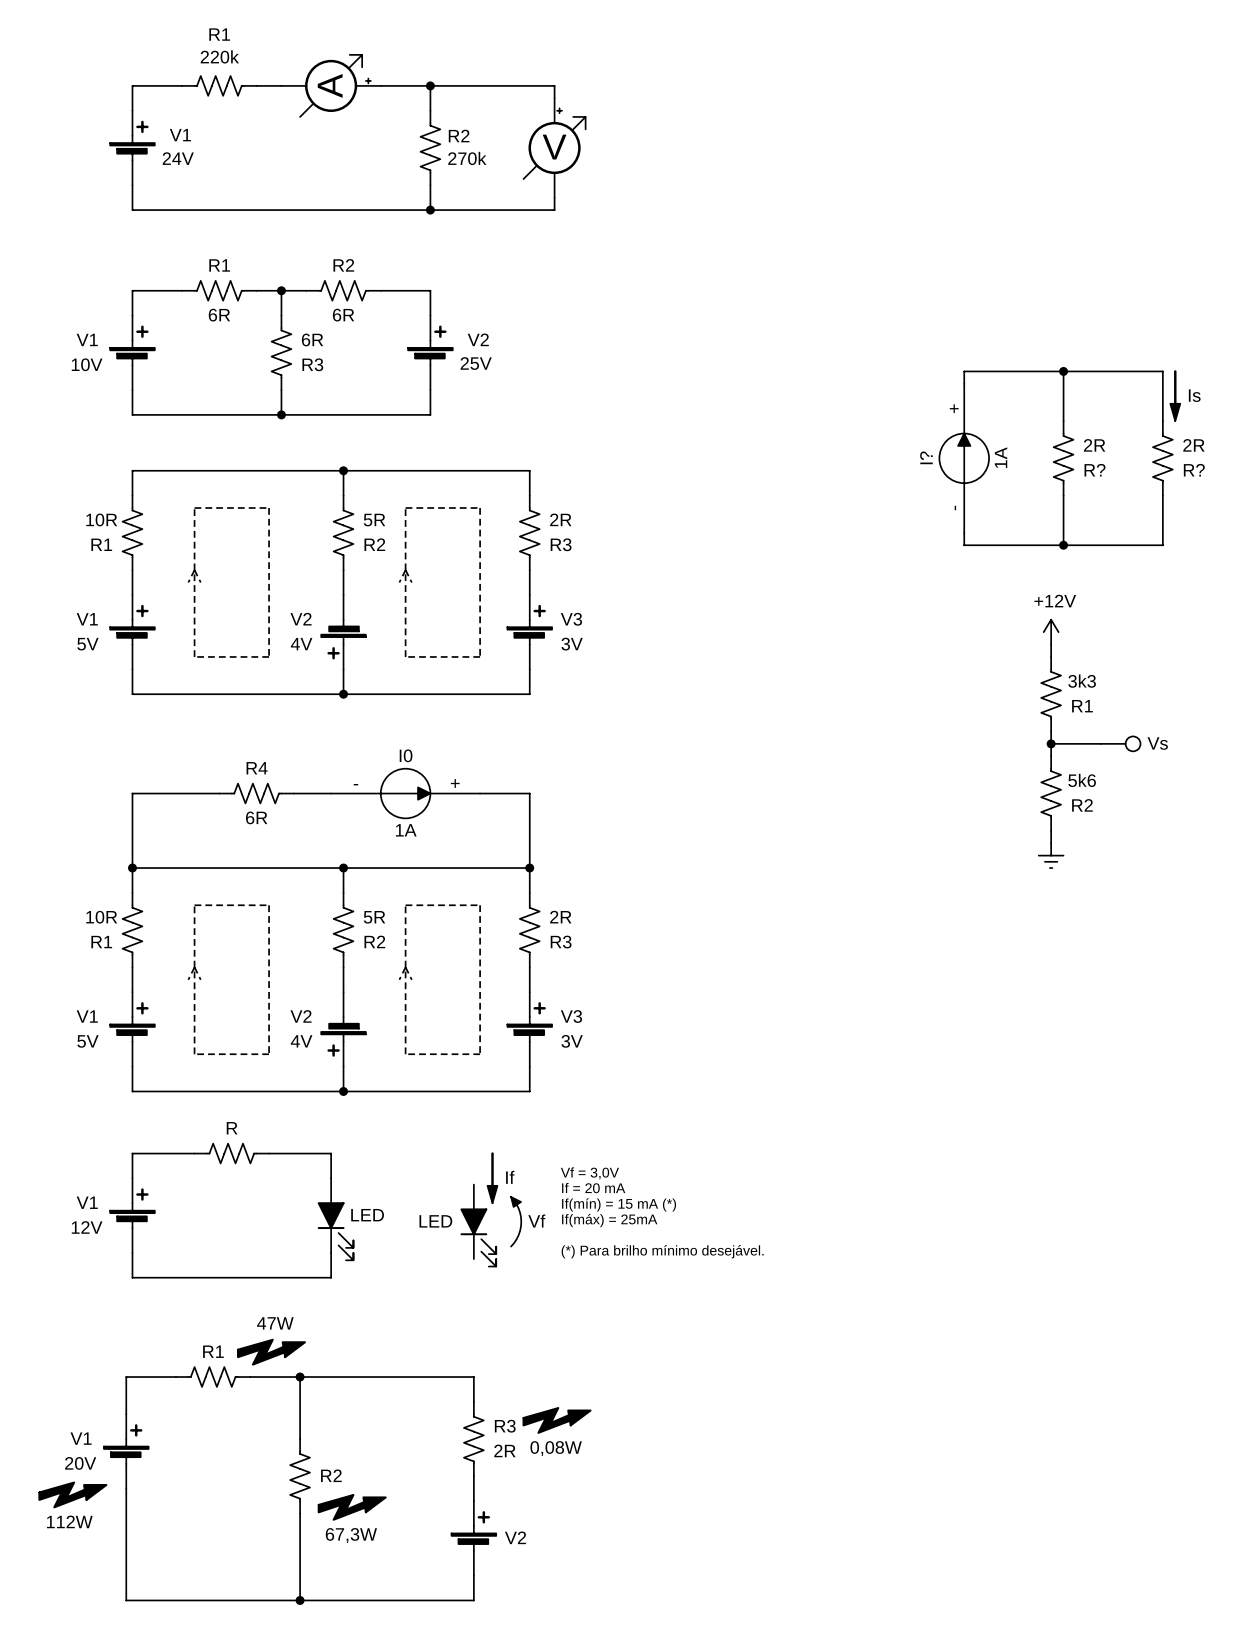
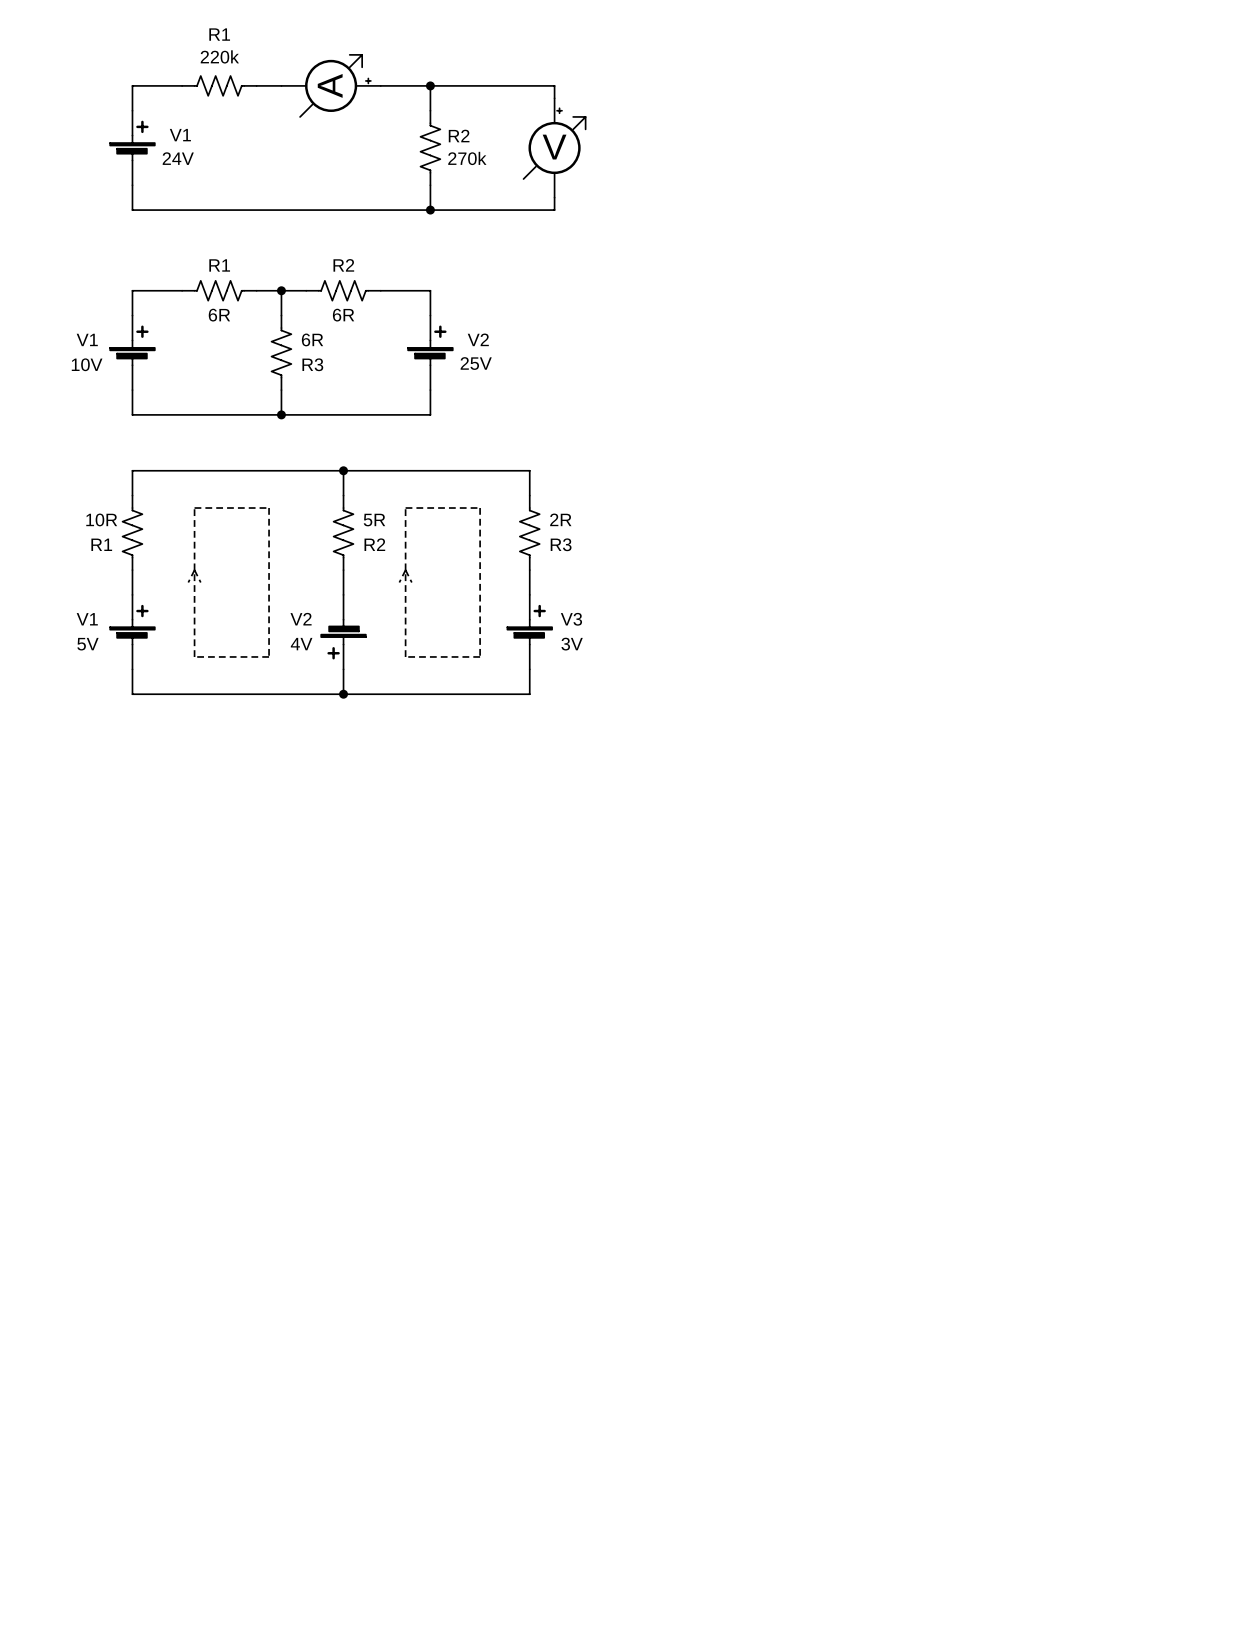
wire: (1063, 371) (1063, 421) -> none
junction: (1063, 371) -> none
wire: (964, 383) (964, 371) (1162, 371) (1162, 421) -> none
Is: (1175, 395) -> none
I?: 1A (964, 458) -> none
R?: 2R (1063, 458) -> none
R?: 2R (1162, 458) -> none
wire: (1063, 495) (1063, 545) -> none
wire: (1162, 495) (1162, 545) (964, 545) (964, 532) -> none
junction: (1063, 545) -> none
power symbol: +12V (1051, 632) -> none
wire: (1051, 644) (1051, 656) -> none
R1: 3k3 (1051, 694) -> none
wire: (1051, 731) (1051, 756) -> none
wire: (1051, 743) (1100, 743) -> none
junction: (1051, 743) -> none
Vs: (1120, 743) -> none
wire: (219, 793) (132, 793) (132, 892) -> none
R4: 6R (256, 793) -> none
wire: (293, 793) (331, 793) -> none
I0: 1A (405, 793) -> none
wire: (480, 793) (529, 793) (529, 892) -> none
R2: 5k6 (1051, 793) -> none
wire: (1051, 830) (1051, 843) -> none
power symbol: (1051, 855) -> none
wire: (132, 868) (529, 868) -> none
junction: (132, 868) -> none
wire: (343, 868) (343, 892) -> none
junction: (343, 868) -> none
junction: (529, 868) -> none
line: (194, 905) (269, 905) (269, 1054) (194, 1054) (194, 905) -> none
line: (405, 905) (405, 1054) (480, 1054) (480, 905) (405, 905) -> none
R1: 10R (132, 930) -> none
R2: 5R (343, 930) -> none
R3: 2R (529, 930) -> none
wire: (132, 967) (132, 992) -> none
wire: (343, 967) (343, 992) -> none
wire: (529, 967) (529, 992) -> none
line: (188, 979) (194, 967) (200, 979) -> none
line: (399, 979) (405, 967) (411, 979) -> none
V1: 5V (132, 1029) -> none
V2: 4V (343, 1029) -> none
V3: 3V (529, 1029) -> none
wire: (132, 1066) (132, 1091) (529, 1091) (529, 1066) -> none
wire: (343, 1066) (343, 1091) -> none
junction: (343, 1091) -> none
wire: (194, 1153) (132, 1153) (132, 1178) -> none
R: (231, 1153) -> none
wire: (269, 1153) (331, 1153) (331, 1178) -> none
text: Vf = 3,0V (589, 1173) -> none
If: (492, 1177) -> none
text: If = 20 mA (593, 1188) -> none
text: If(mín) = 15 mA (*) (619, 1204) -> none
V1: 12V (132, 1215) -> none
part: LED (335, 1219) -> none
text: If(máx) = 25mA (609, 1220) -> none
Vf: (516, 1221) -> none
part: LED (478, 1225) -> none
text: (*) Para brilho mínimo desejável. (662, 1251) -> none
wire: (132, 1252) (132, 1277) (331, 1277) (331, 1252) -> none
text: 47W (275, 1323) -> none
power symbol: (271, 1352) -> none
wire: (175, 1377) (126, 1377) (126, 1414) -> none
R1: (213, 1377) -> none
wire: (250, 1377) (473, 1377) (473, 1401) -> none
wire: (300, 1377) (300, 1439) -> none
junction: (300, 1377) -> none
power symbol: (557, 1420) -> none
R3: 2R (473, 1439) -> none
text: 0,08W (556, 1448) -> none
V1: 20V (126, 1451) -> none
R2: (300, 1476) -> none
wire: (473, 1476) (473, 1501) -> none
wire: (126, 1488) (126, 1600) (473, 1600) (473, 1575) -> none
power symbol: (72, 1494) -> none
power symbol: (352, 1507) -> none
wire: (300, 1513) (300, 1600) -> none
text: 112W (69, 1521) -> none
text: 67,3W (351, 1535) -> none
V2: (473, 1538) -> none
junction: (300, 1600) -> none

